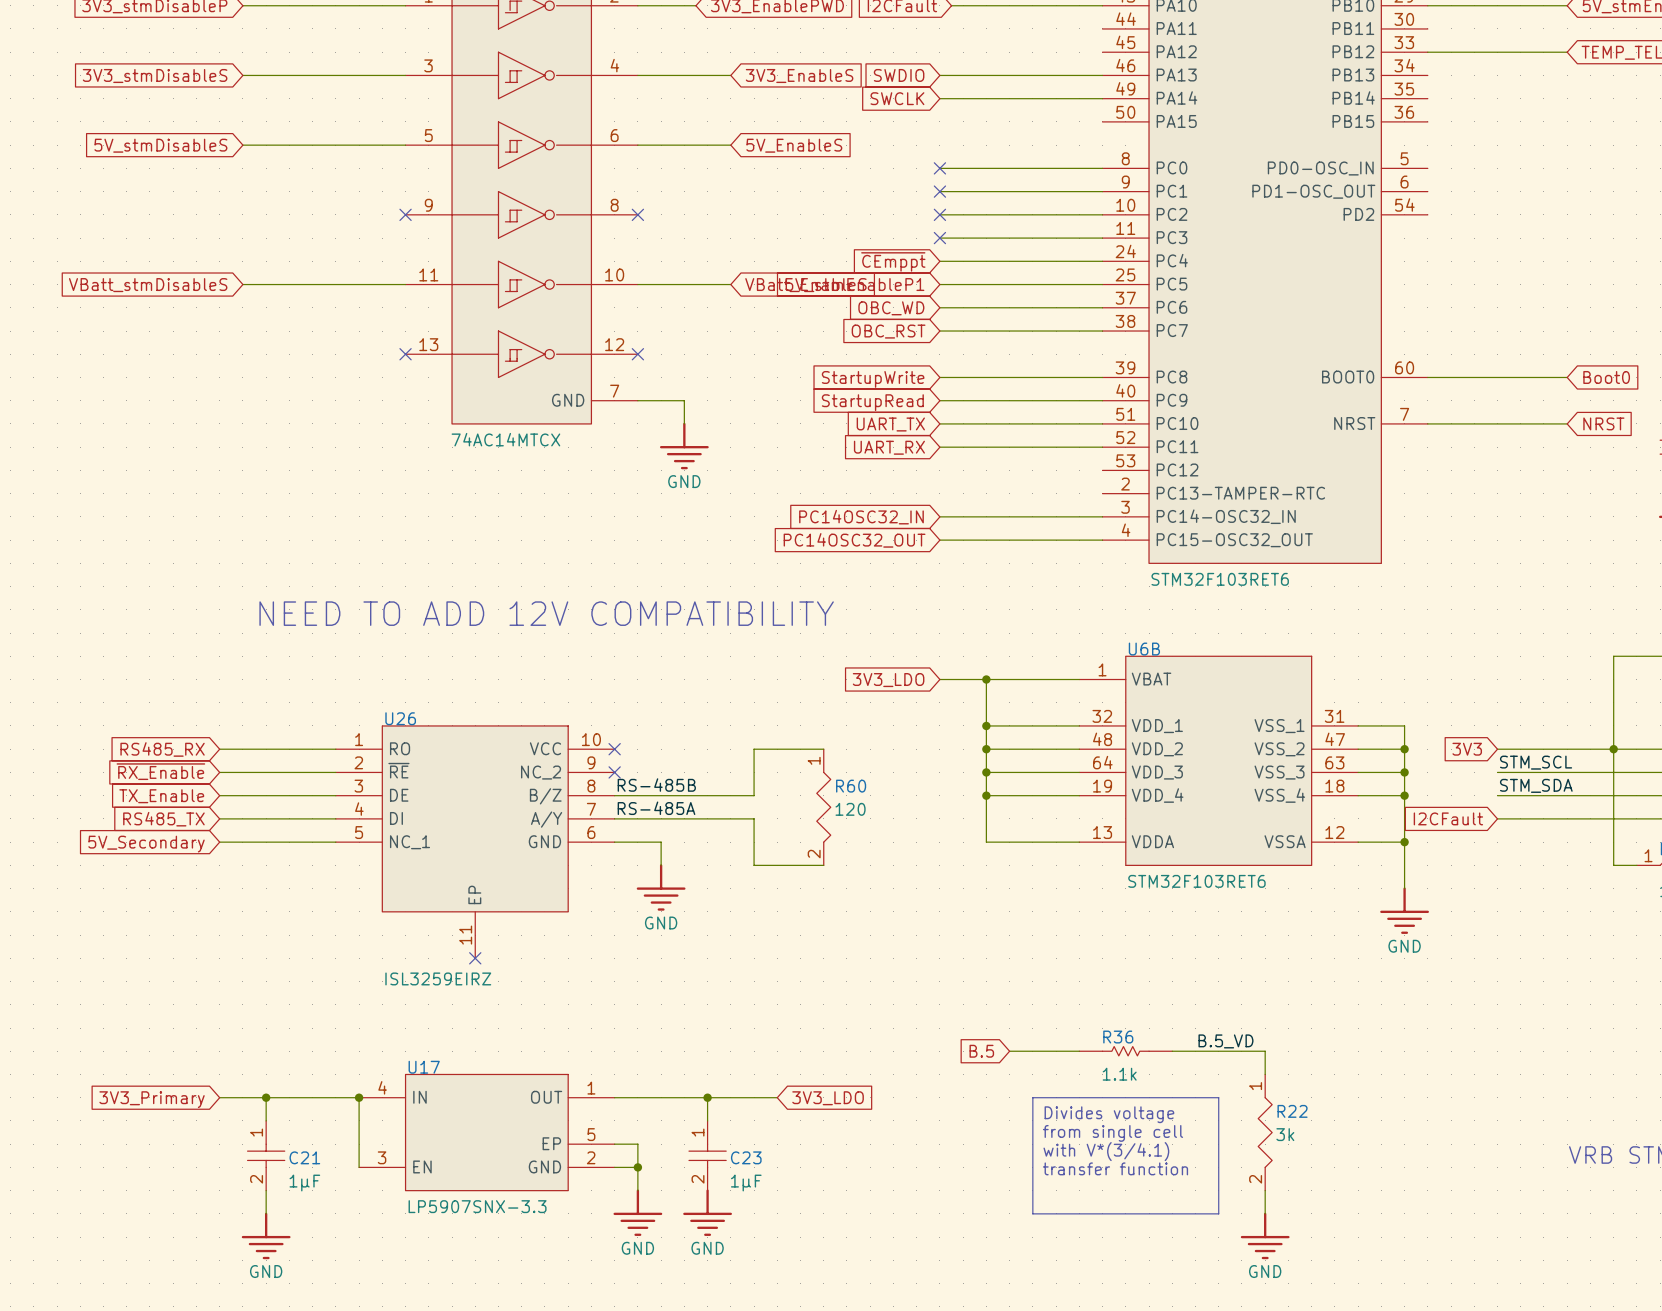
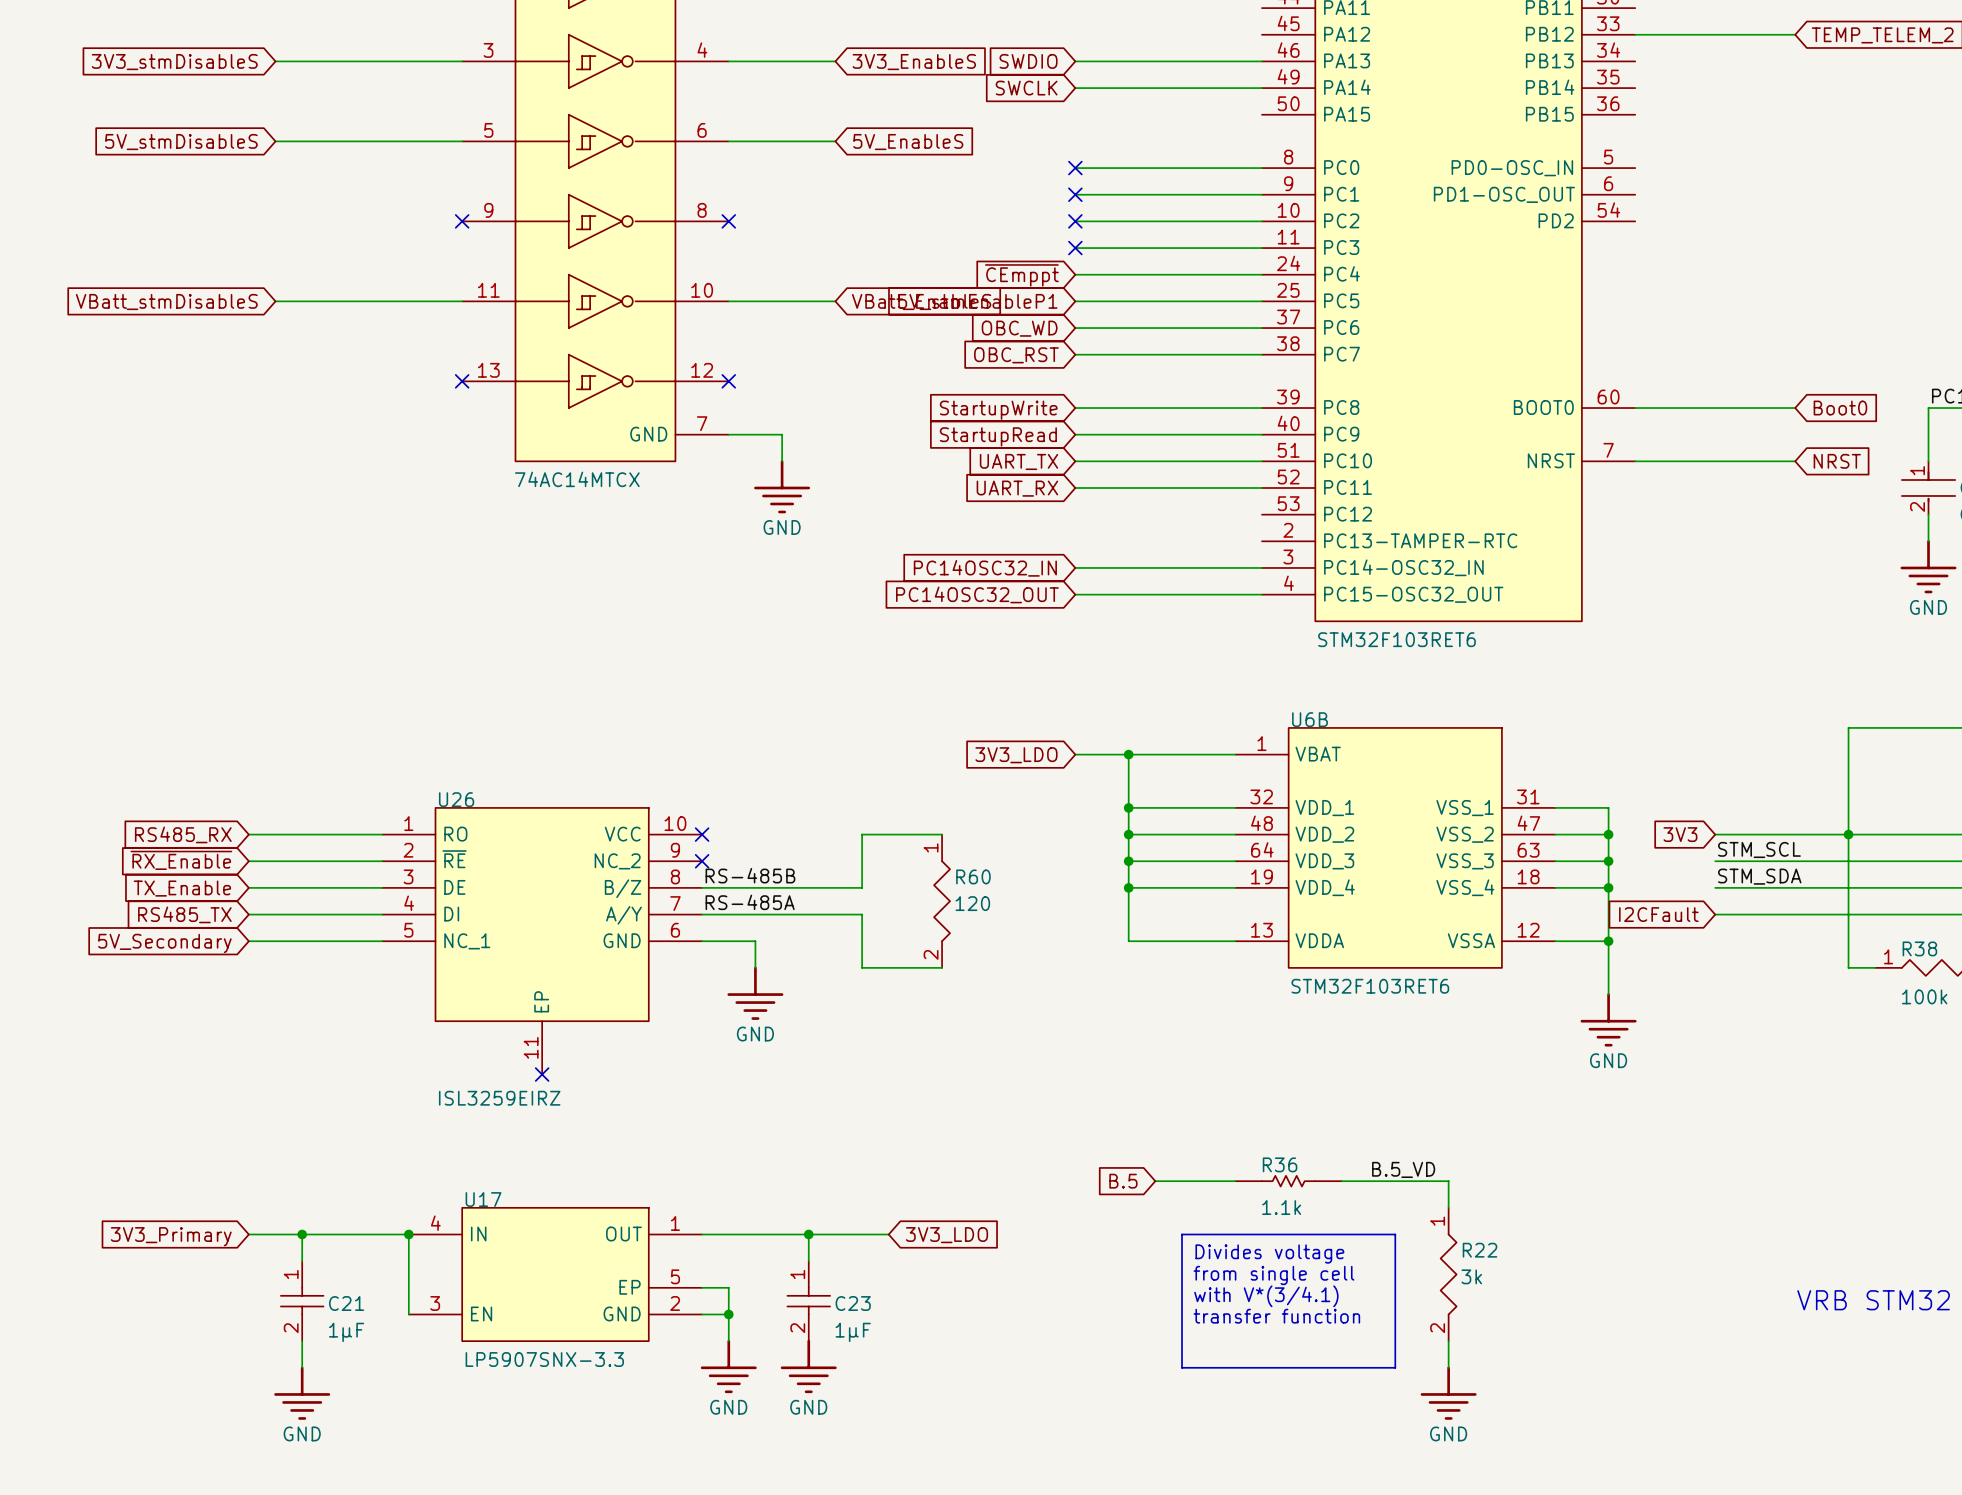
text: NEED TO ADD 12V COMPATIBILITY (546, 613) -> none

